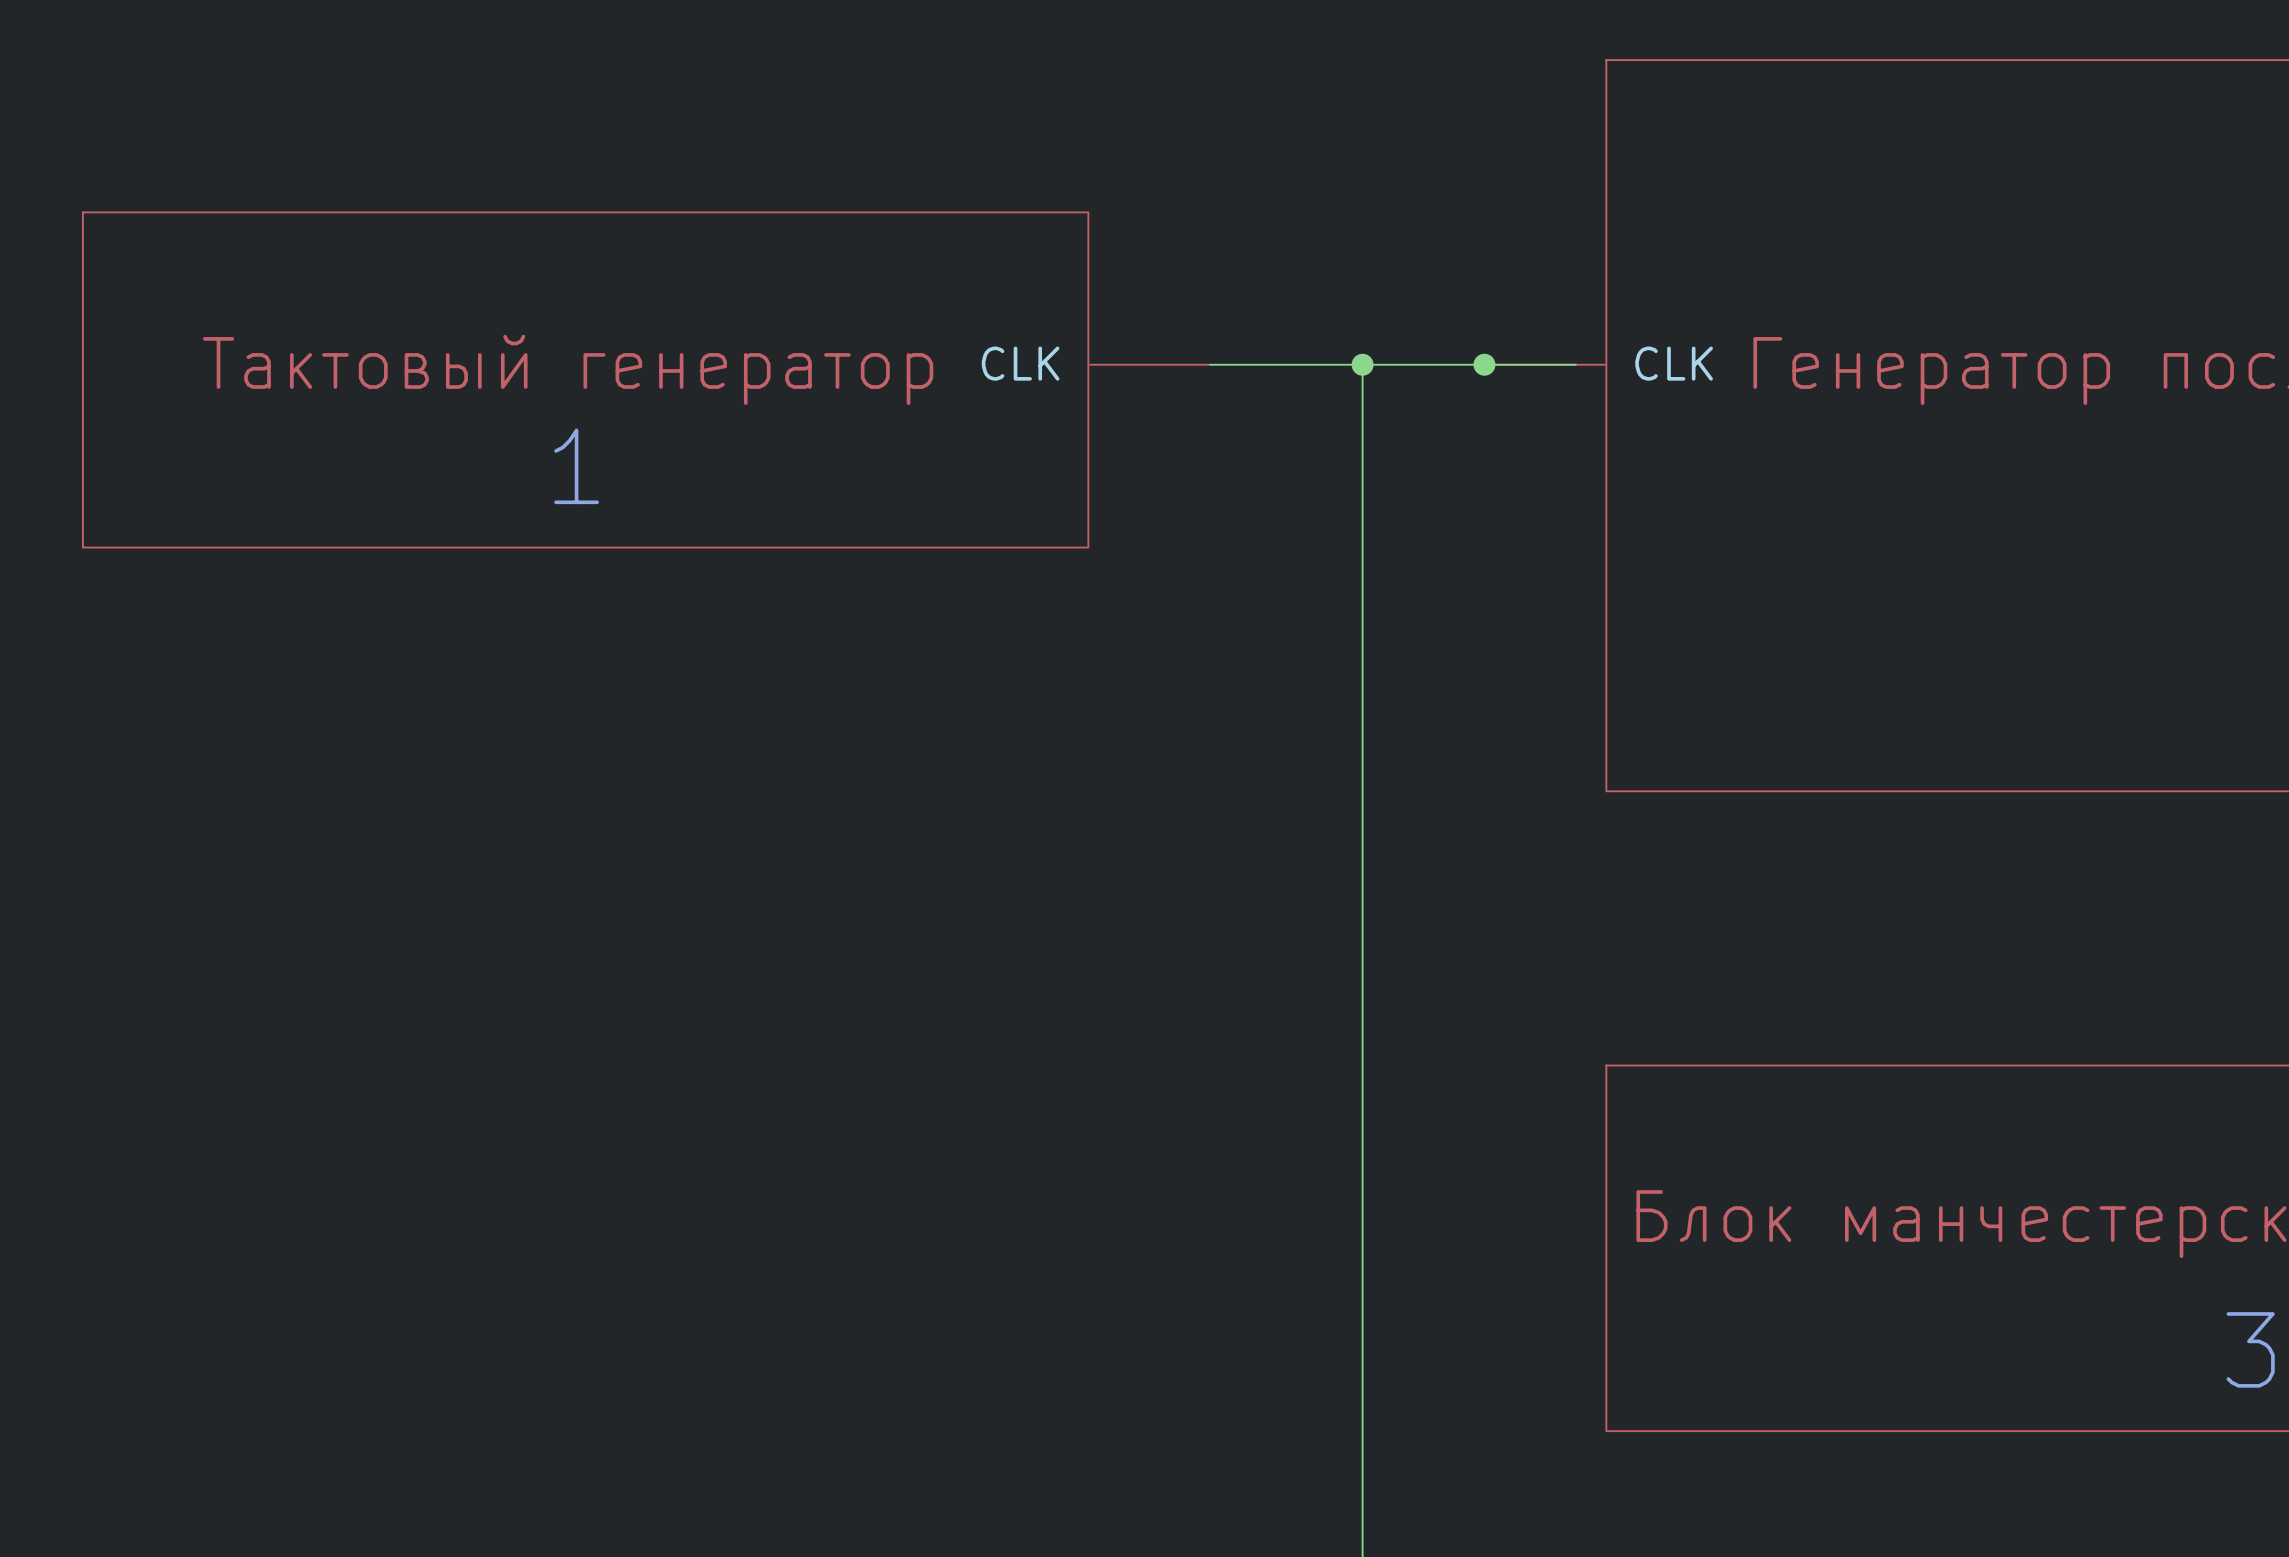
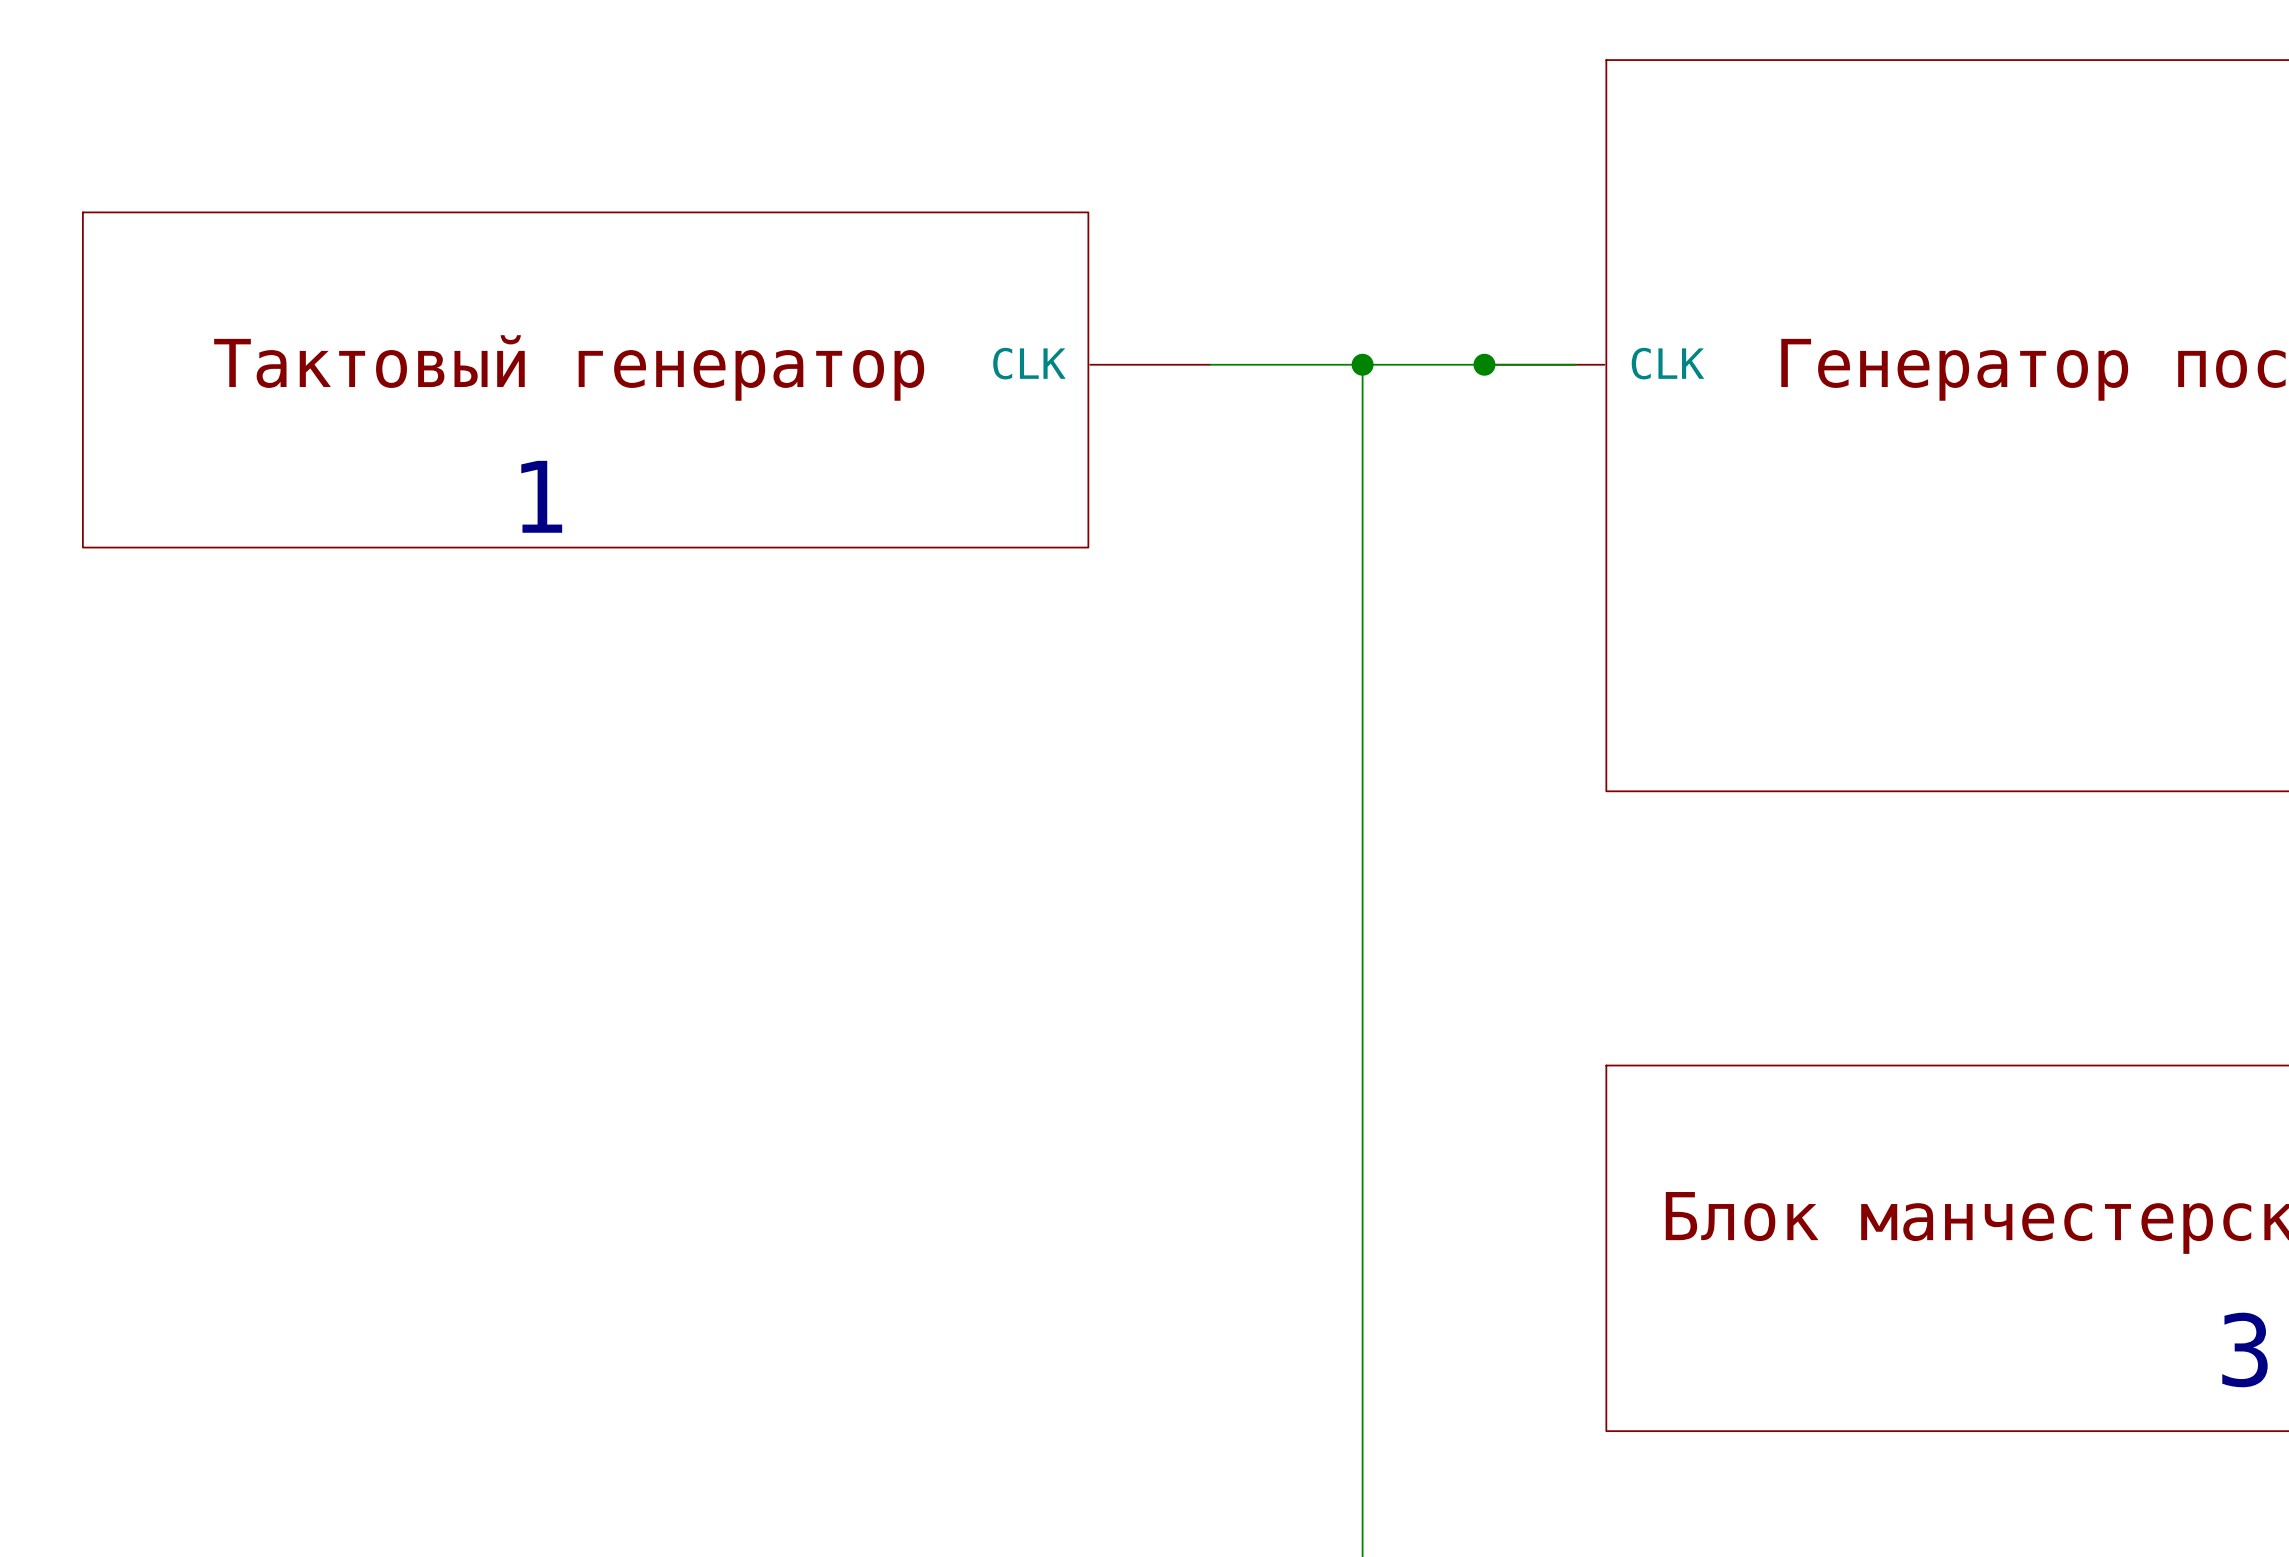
text position: 1 (576, 466) -> 1 (541, 496)

